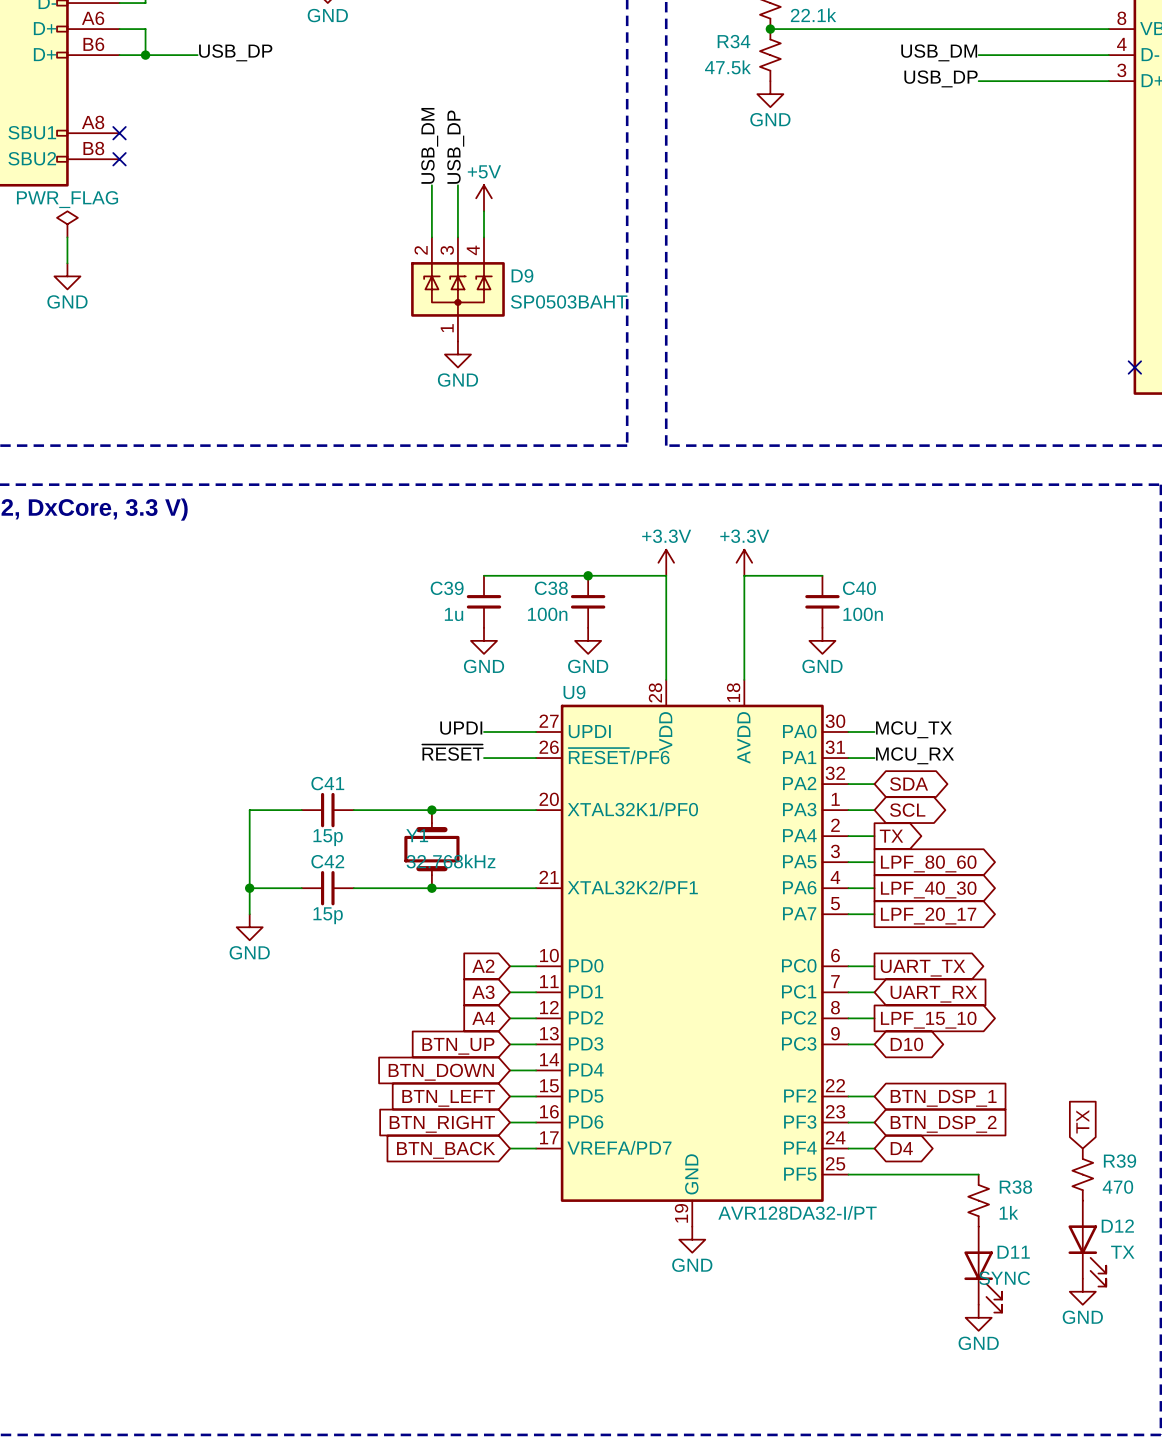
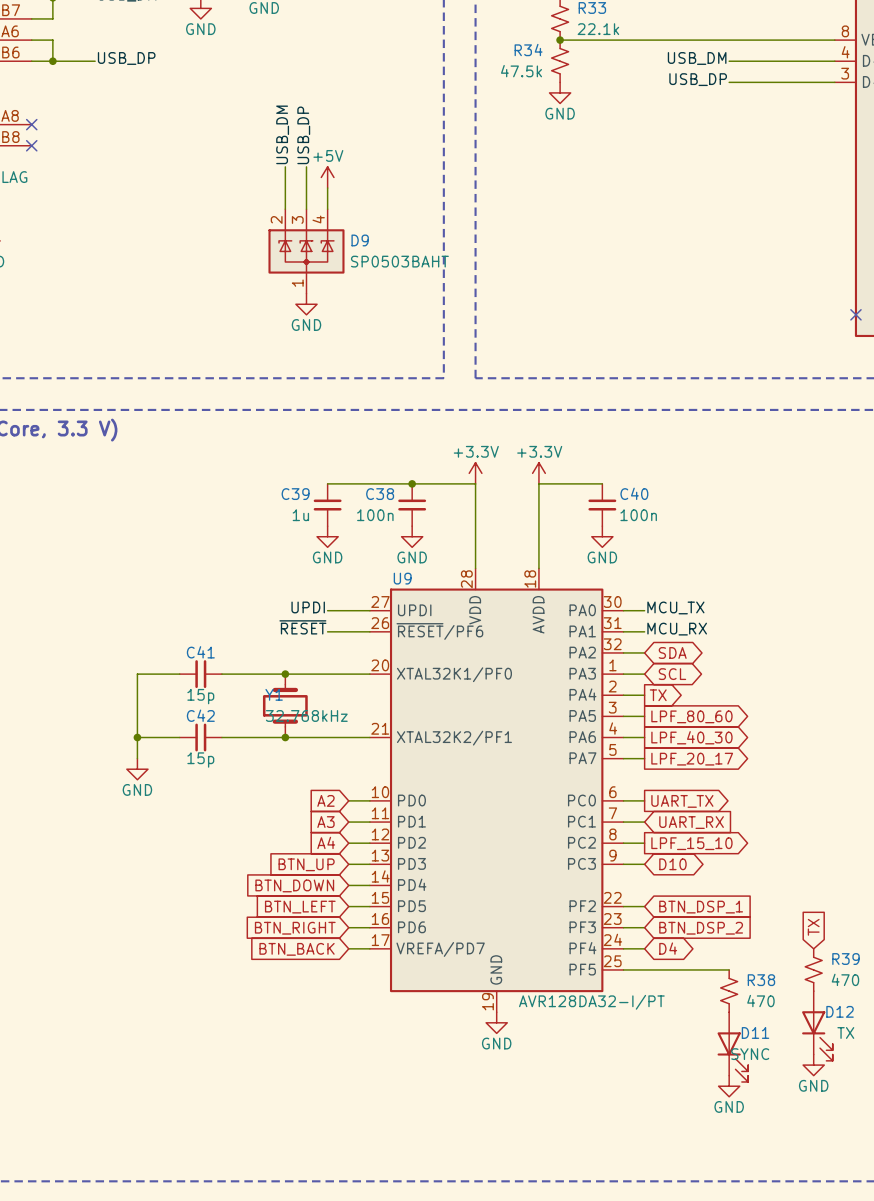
R38 value: 1k (1008, 1212) -> 470 (760, 1001)

